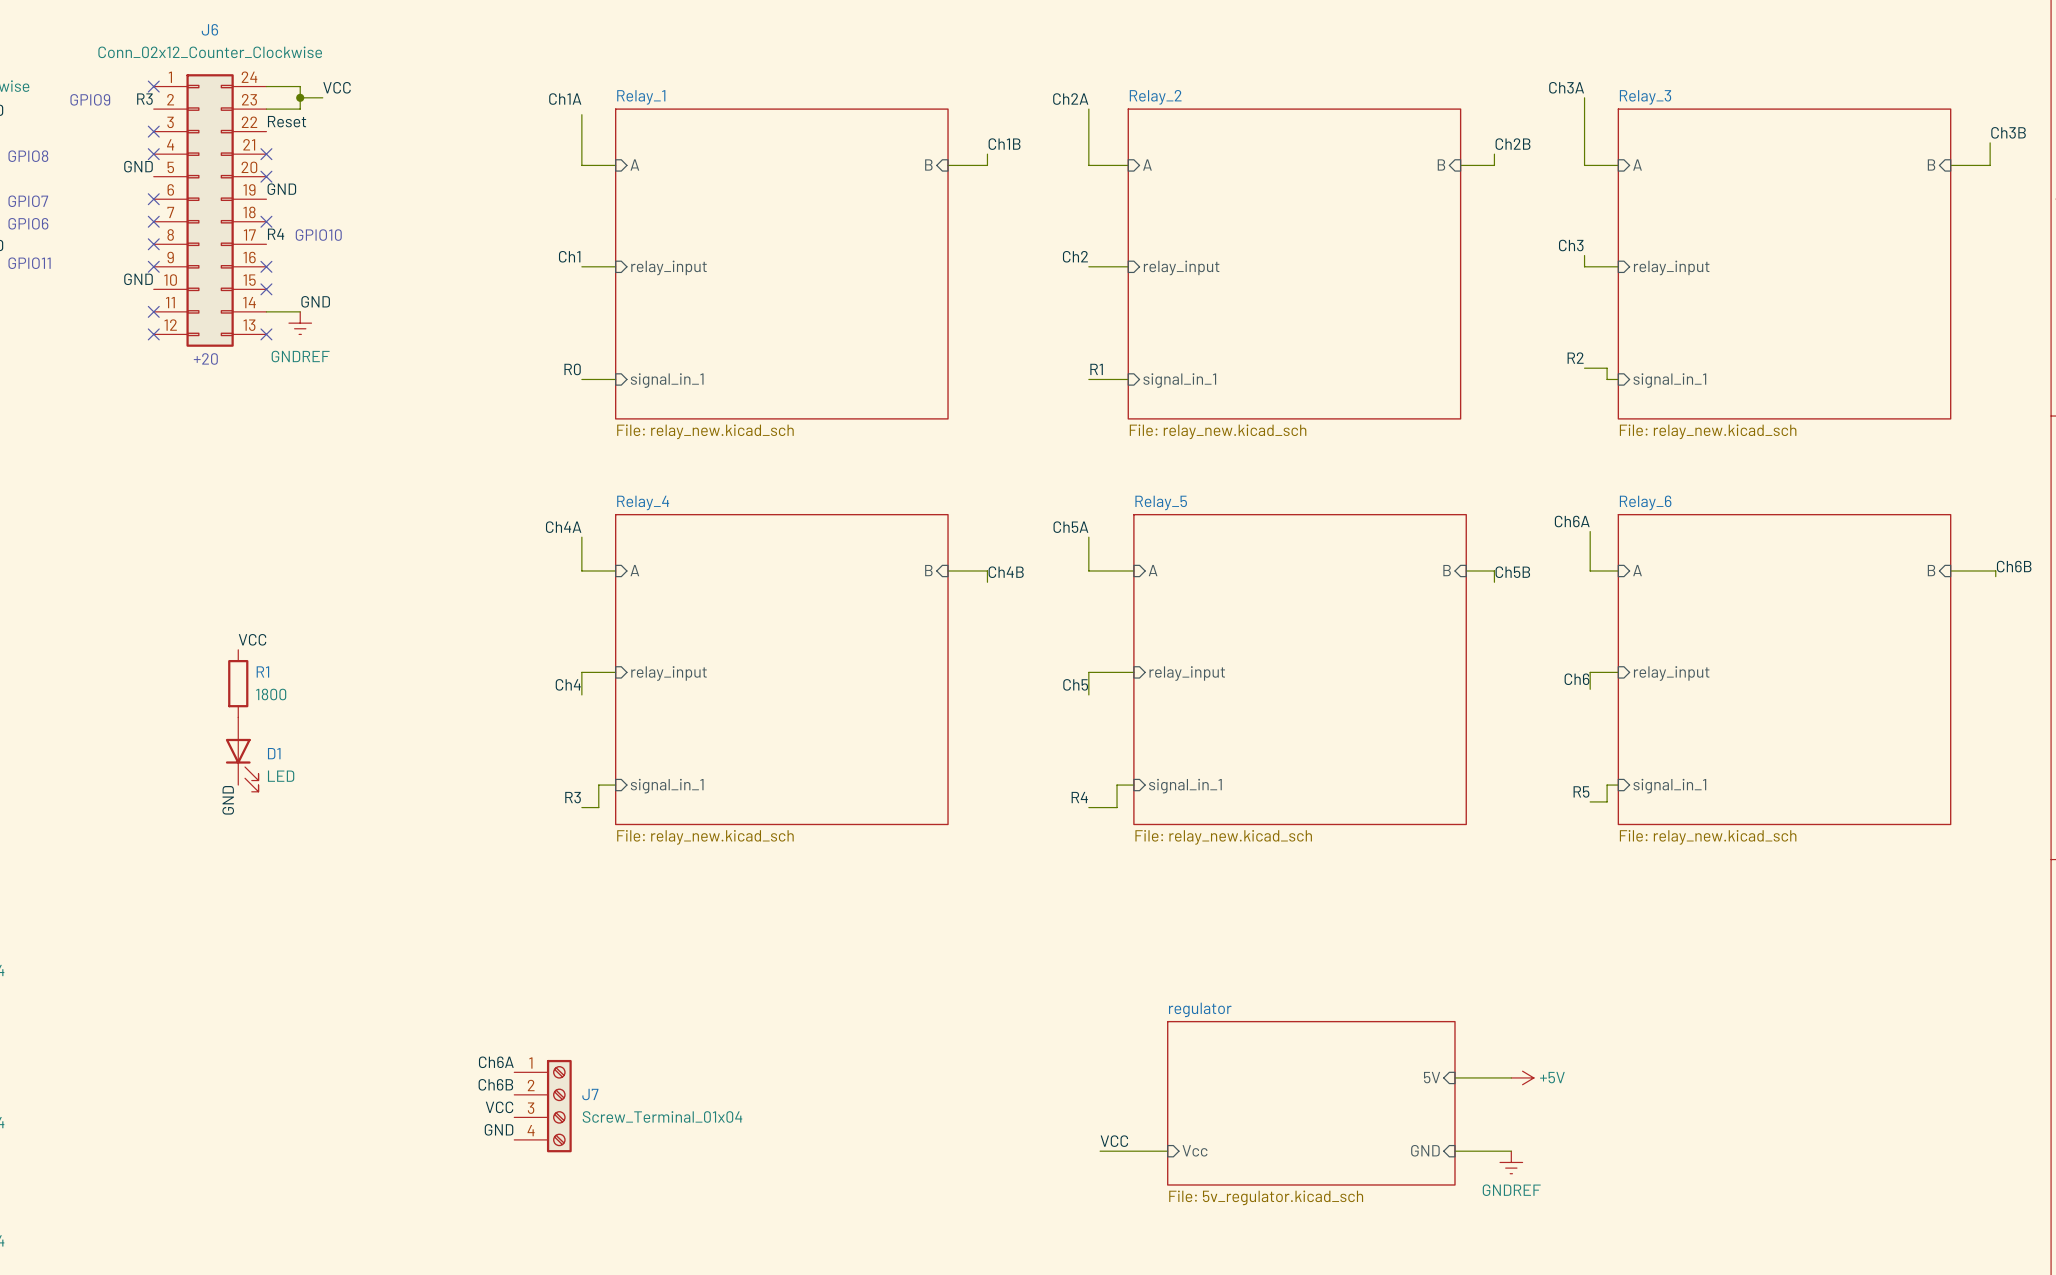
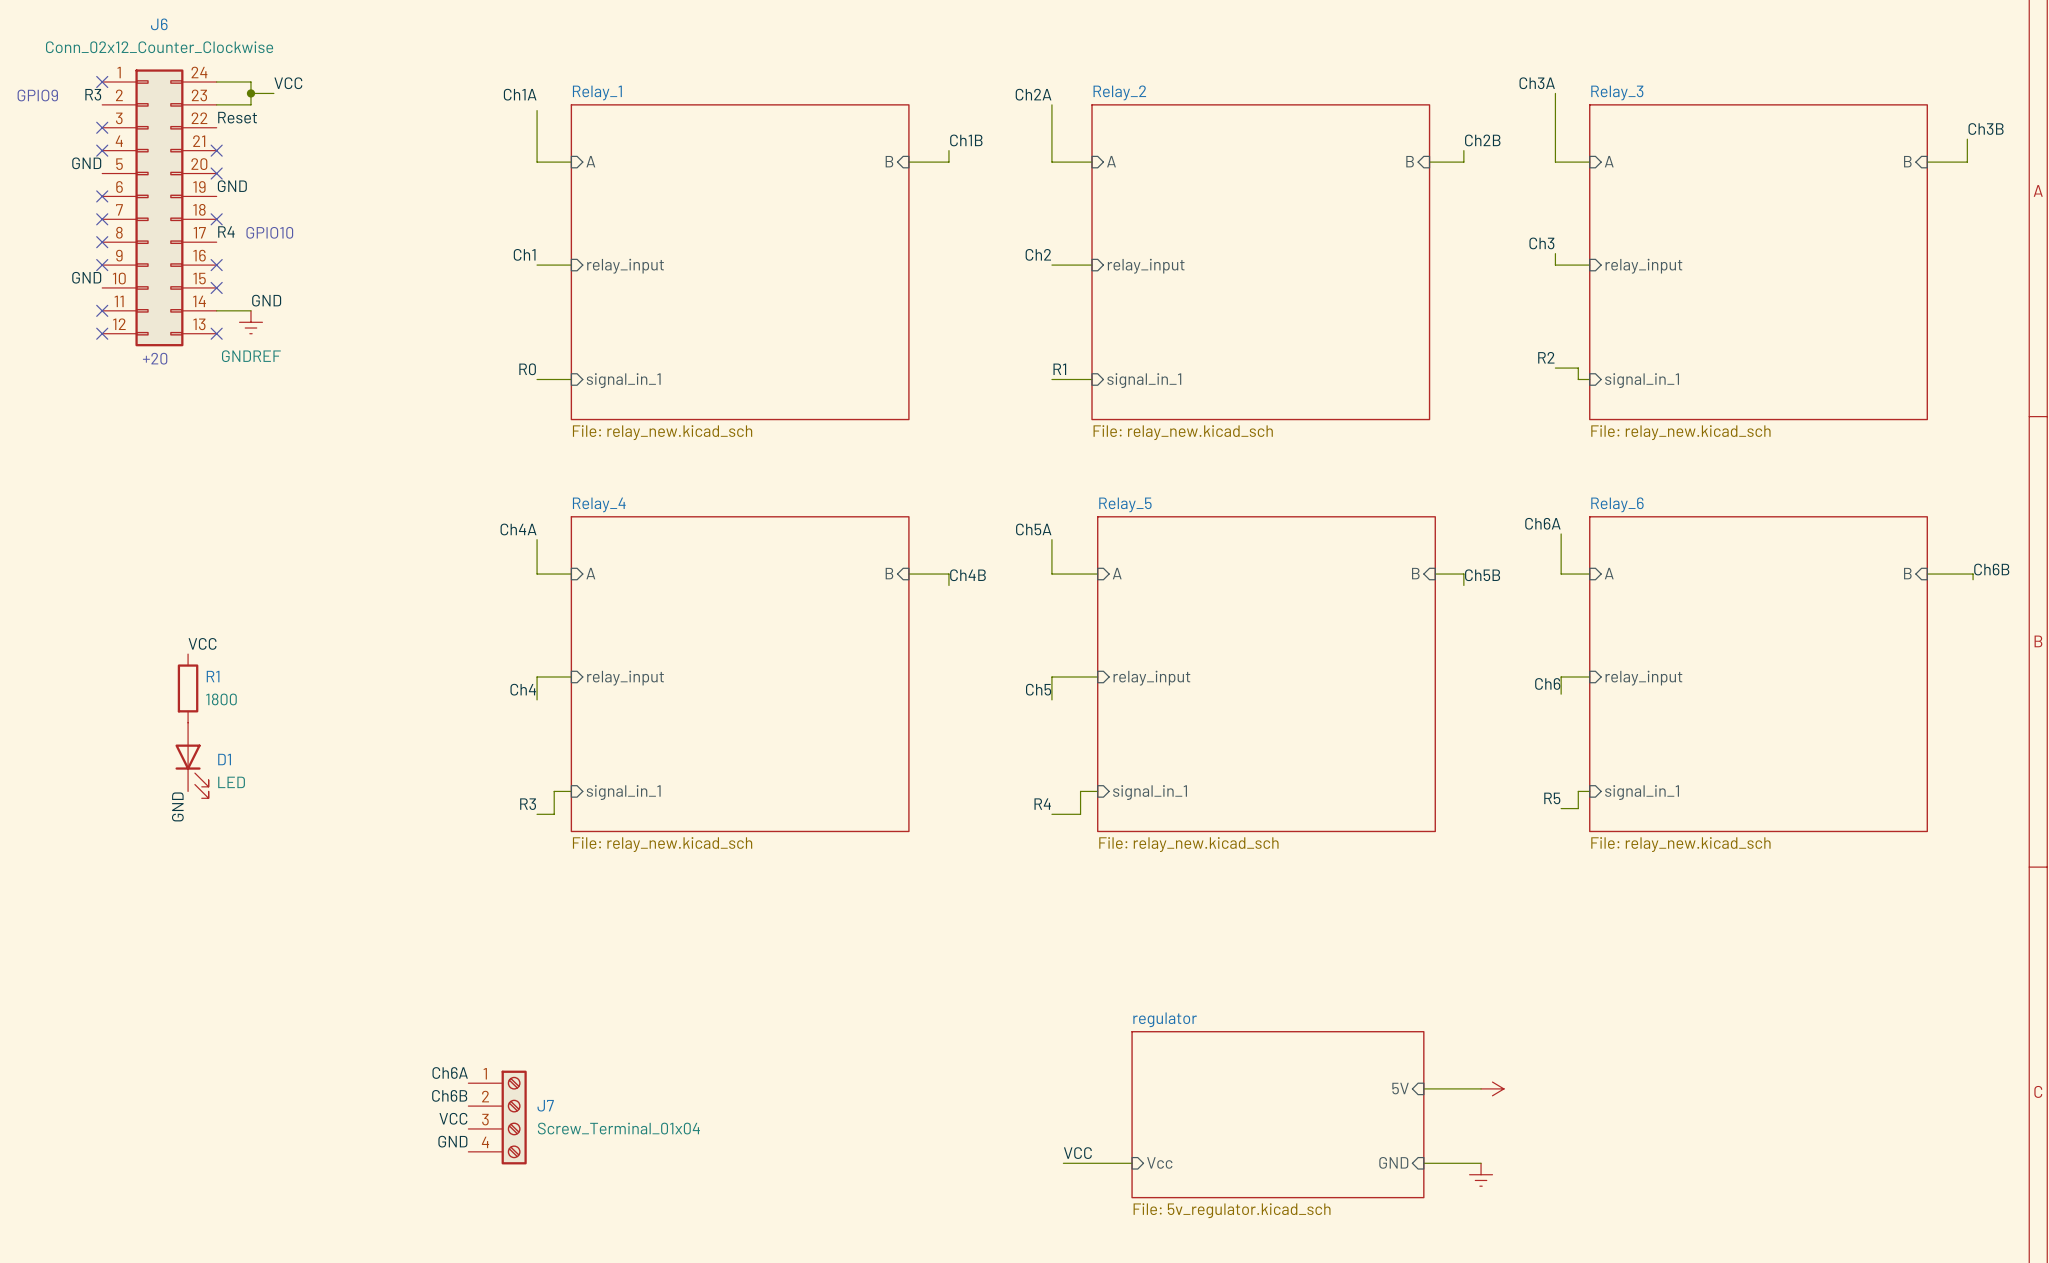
power symbol text: +5V (1552, 1077) -> none
power symbol text: GNDREF (1511, 1190) -> none

